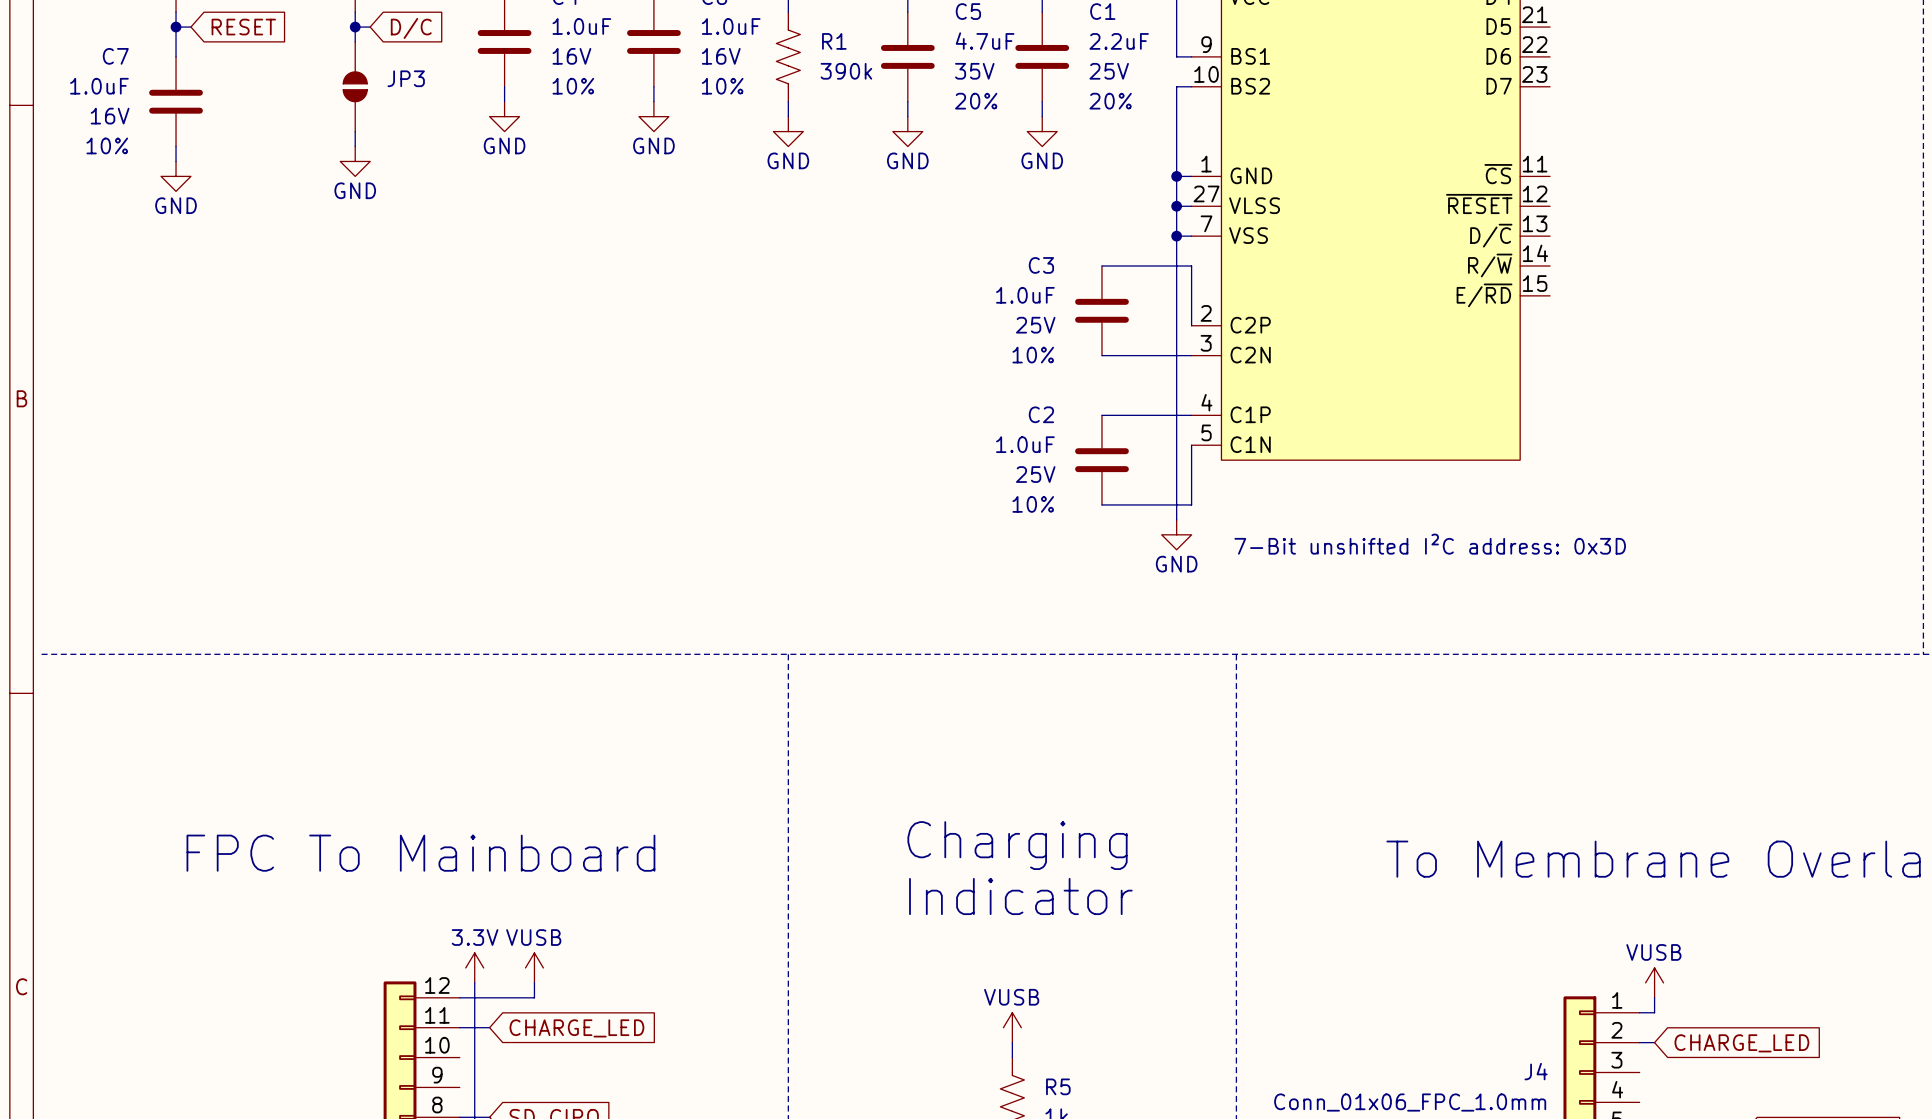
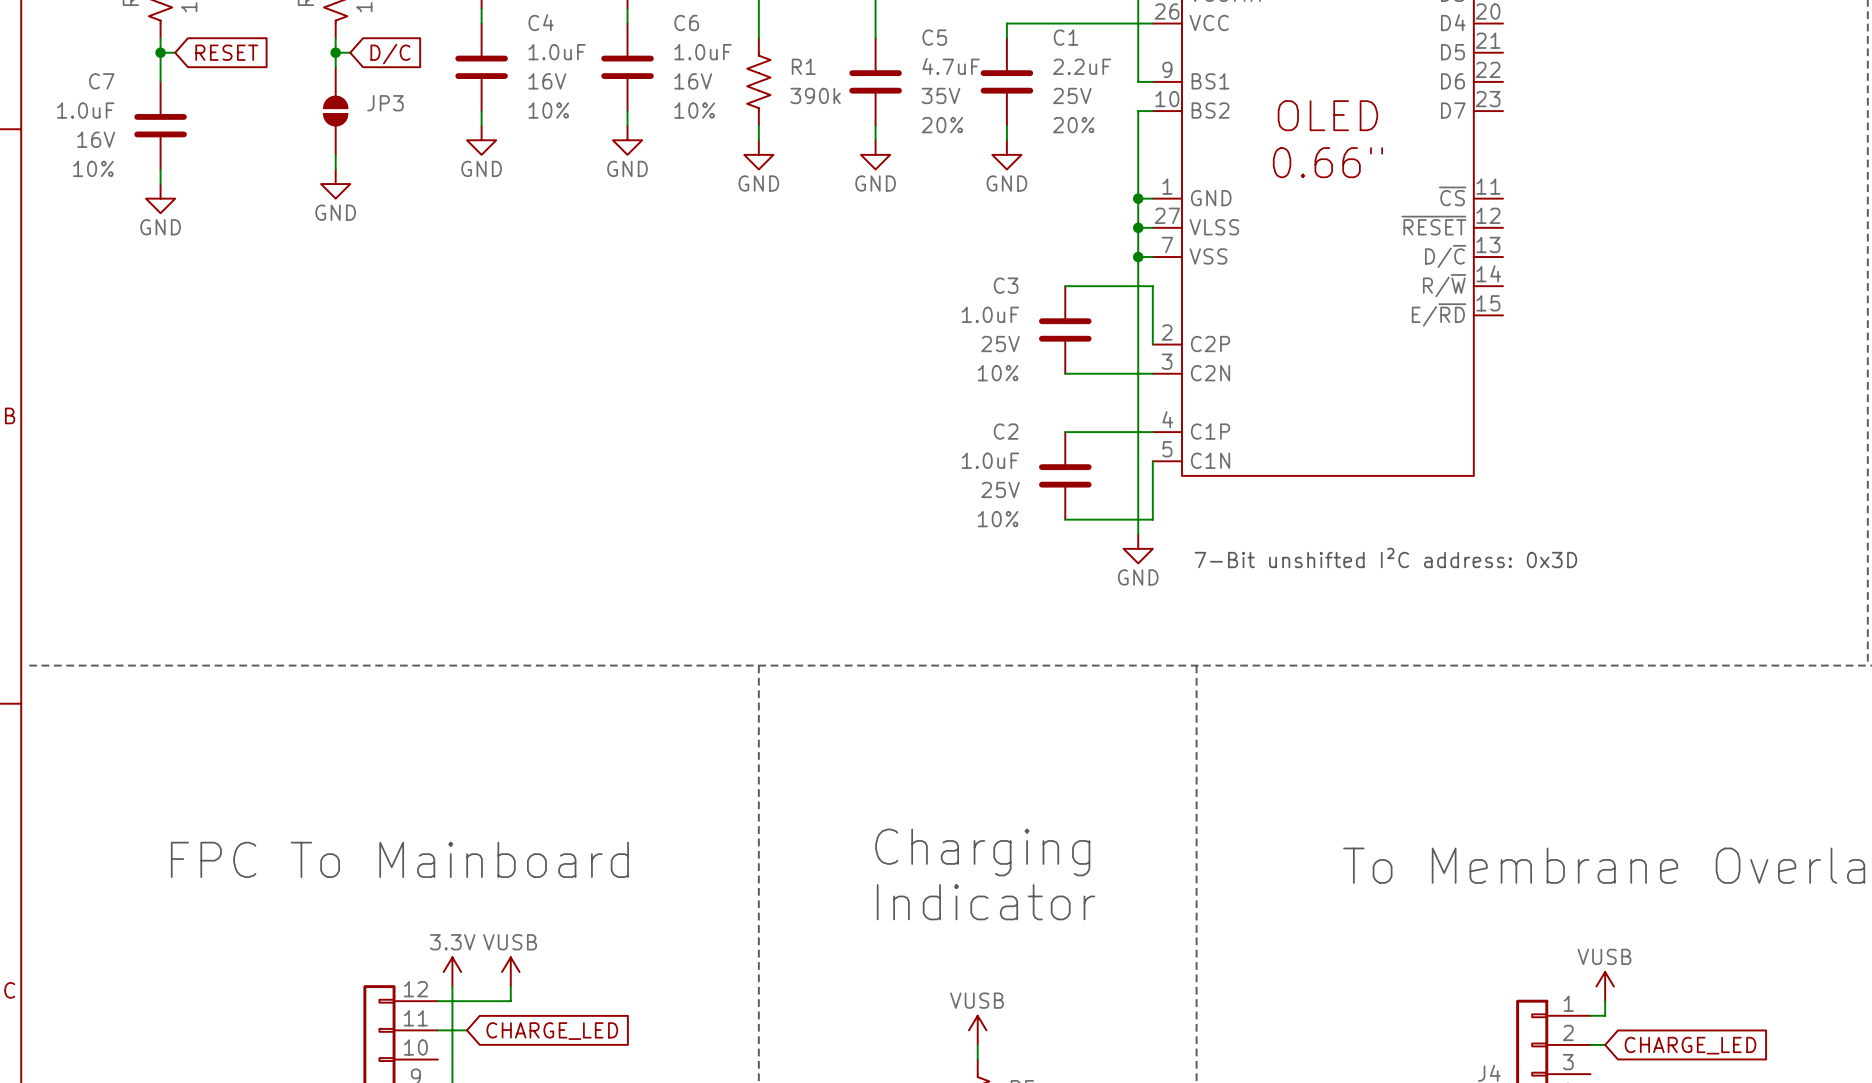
part text: none -> OLED (1327, 115)
part text: none -> 0.66" (1327, 162)

